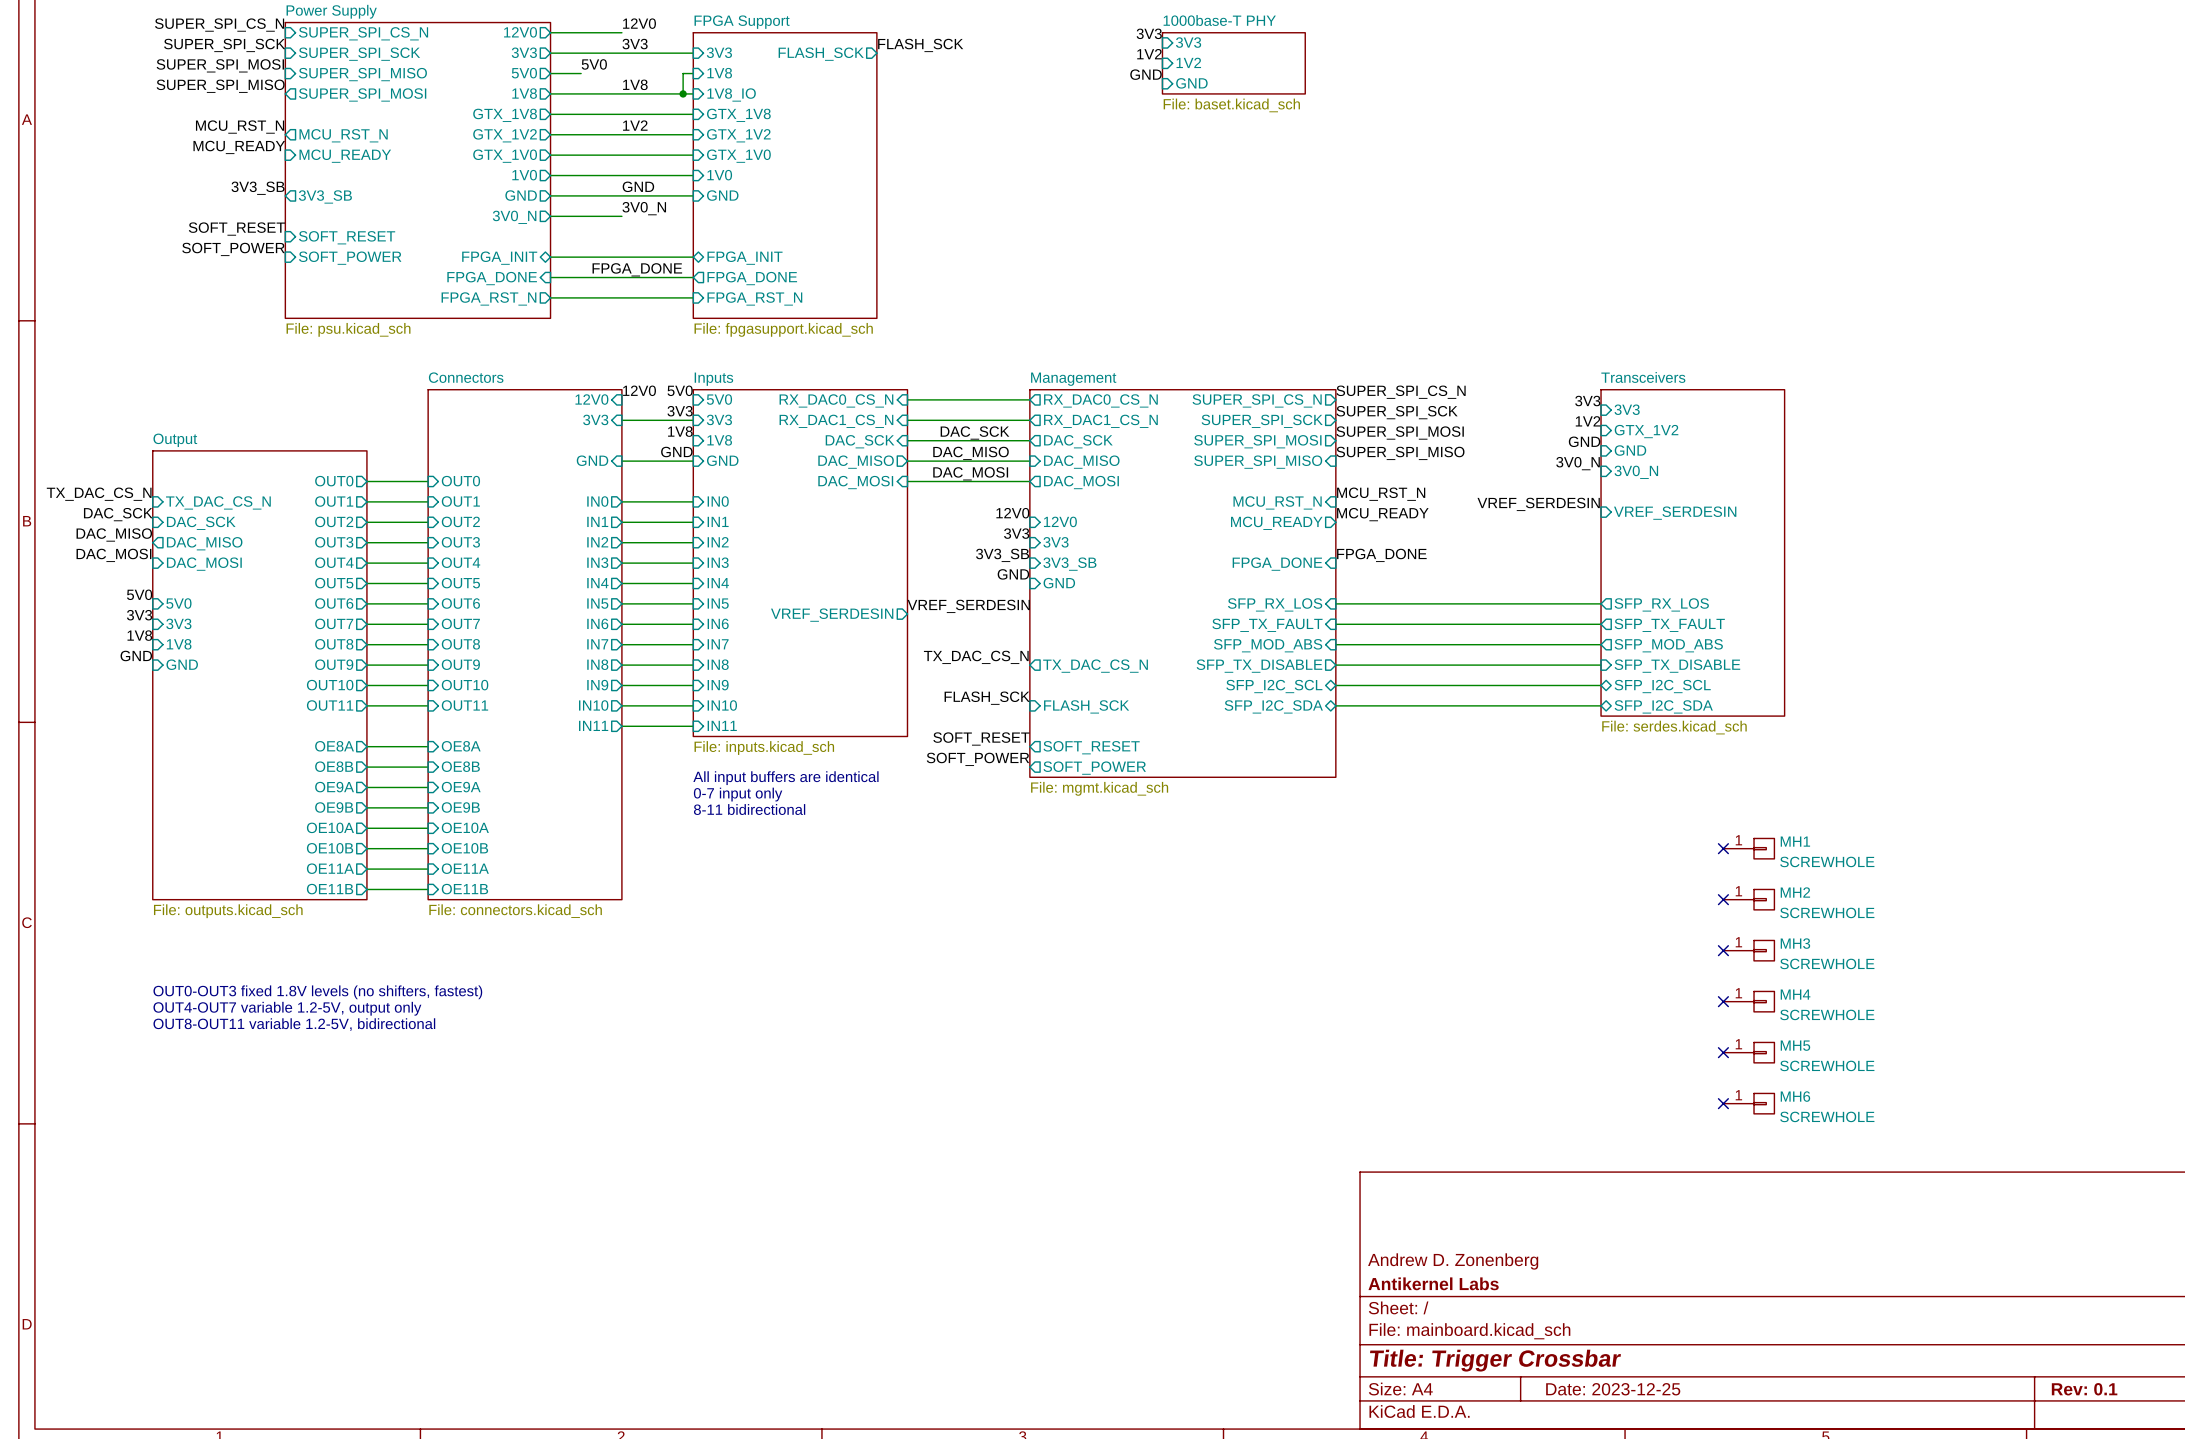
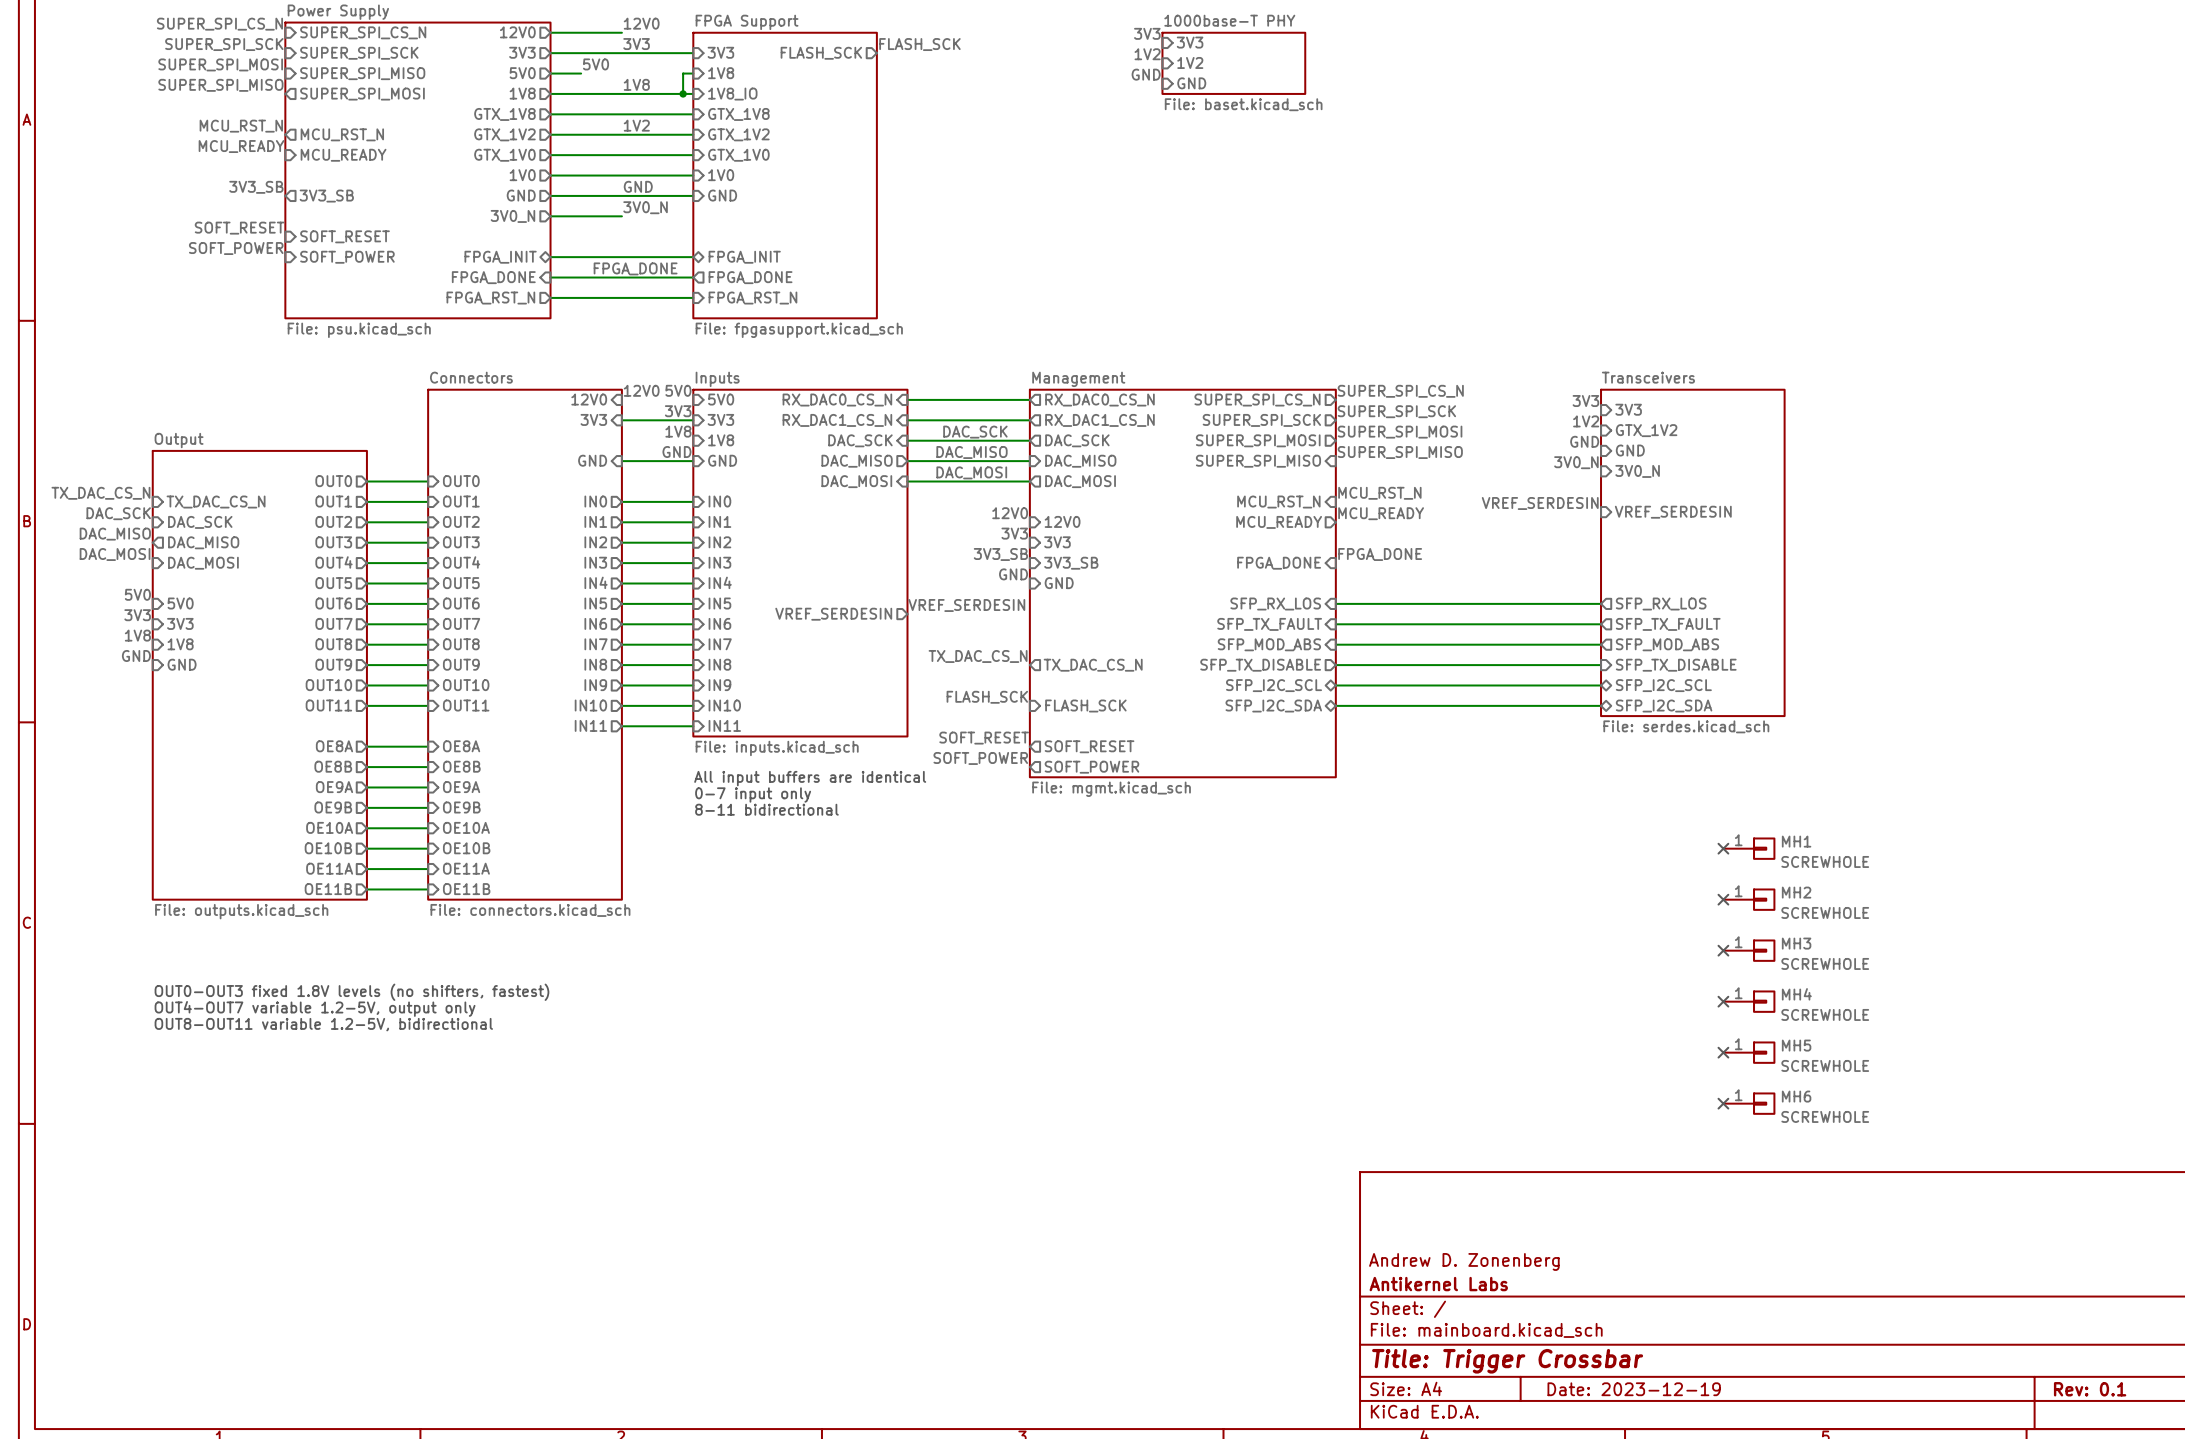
title block: Date: 2023-12-25 (1613, 1389) -> Date: 2023-12-19 (1634, 1389)

